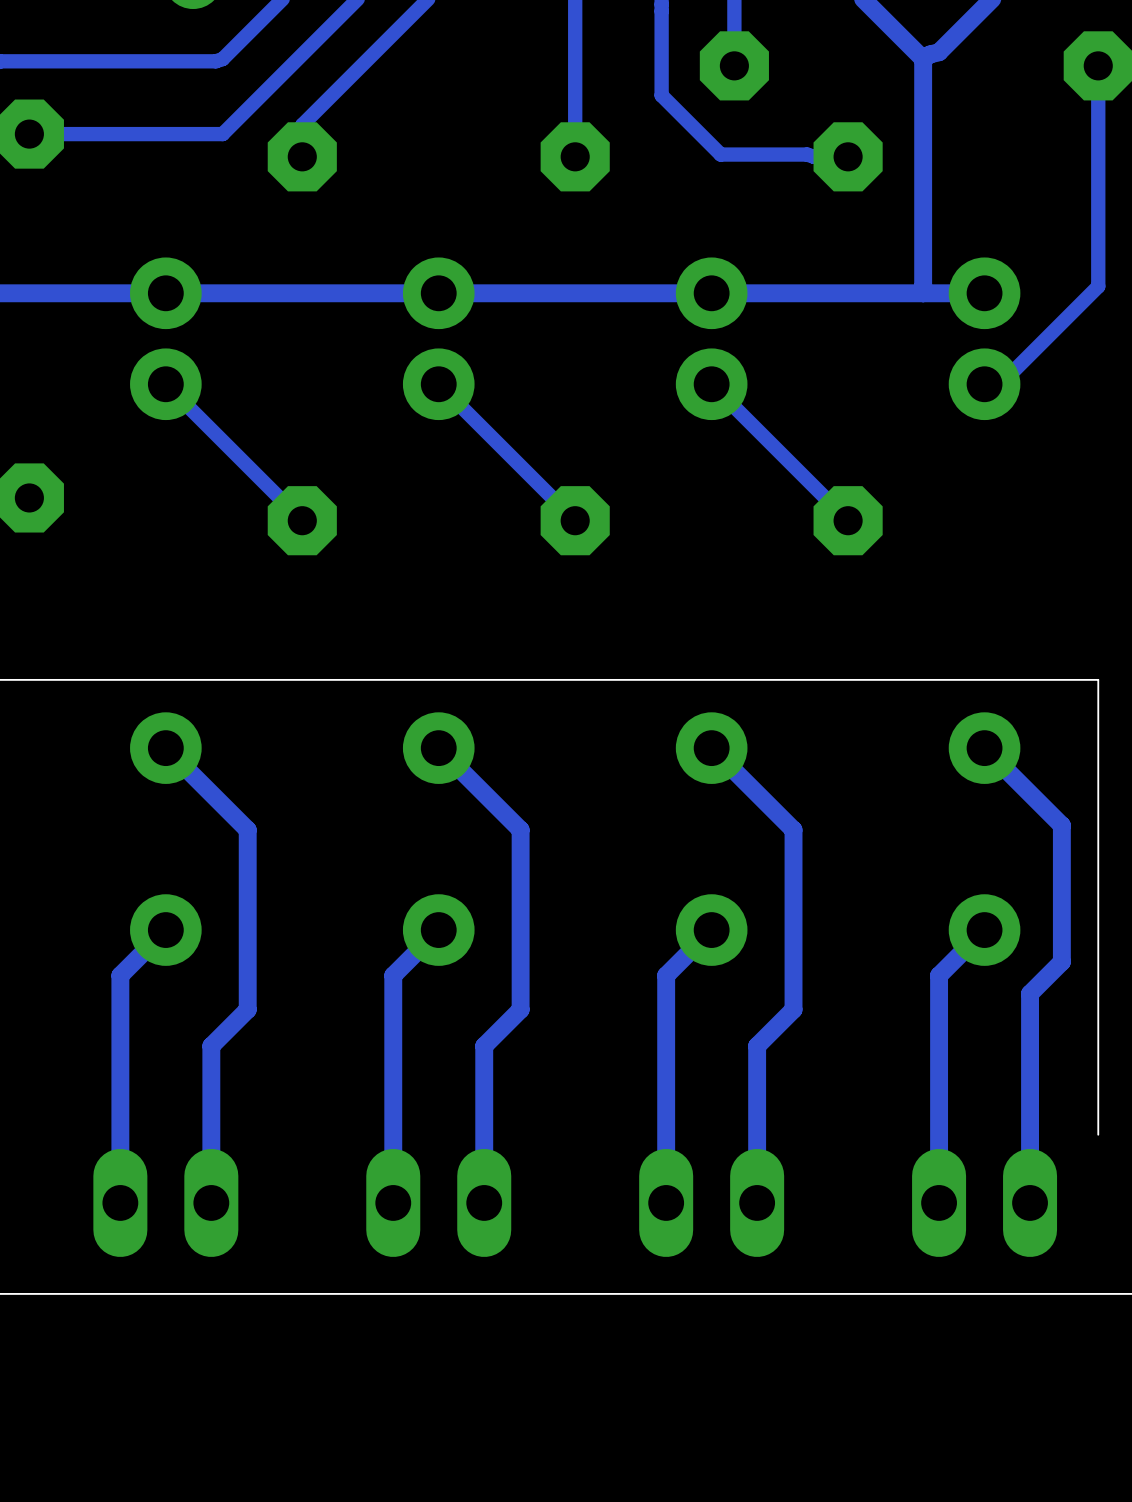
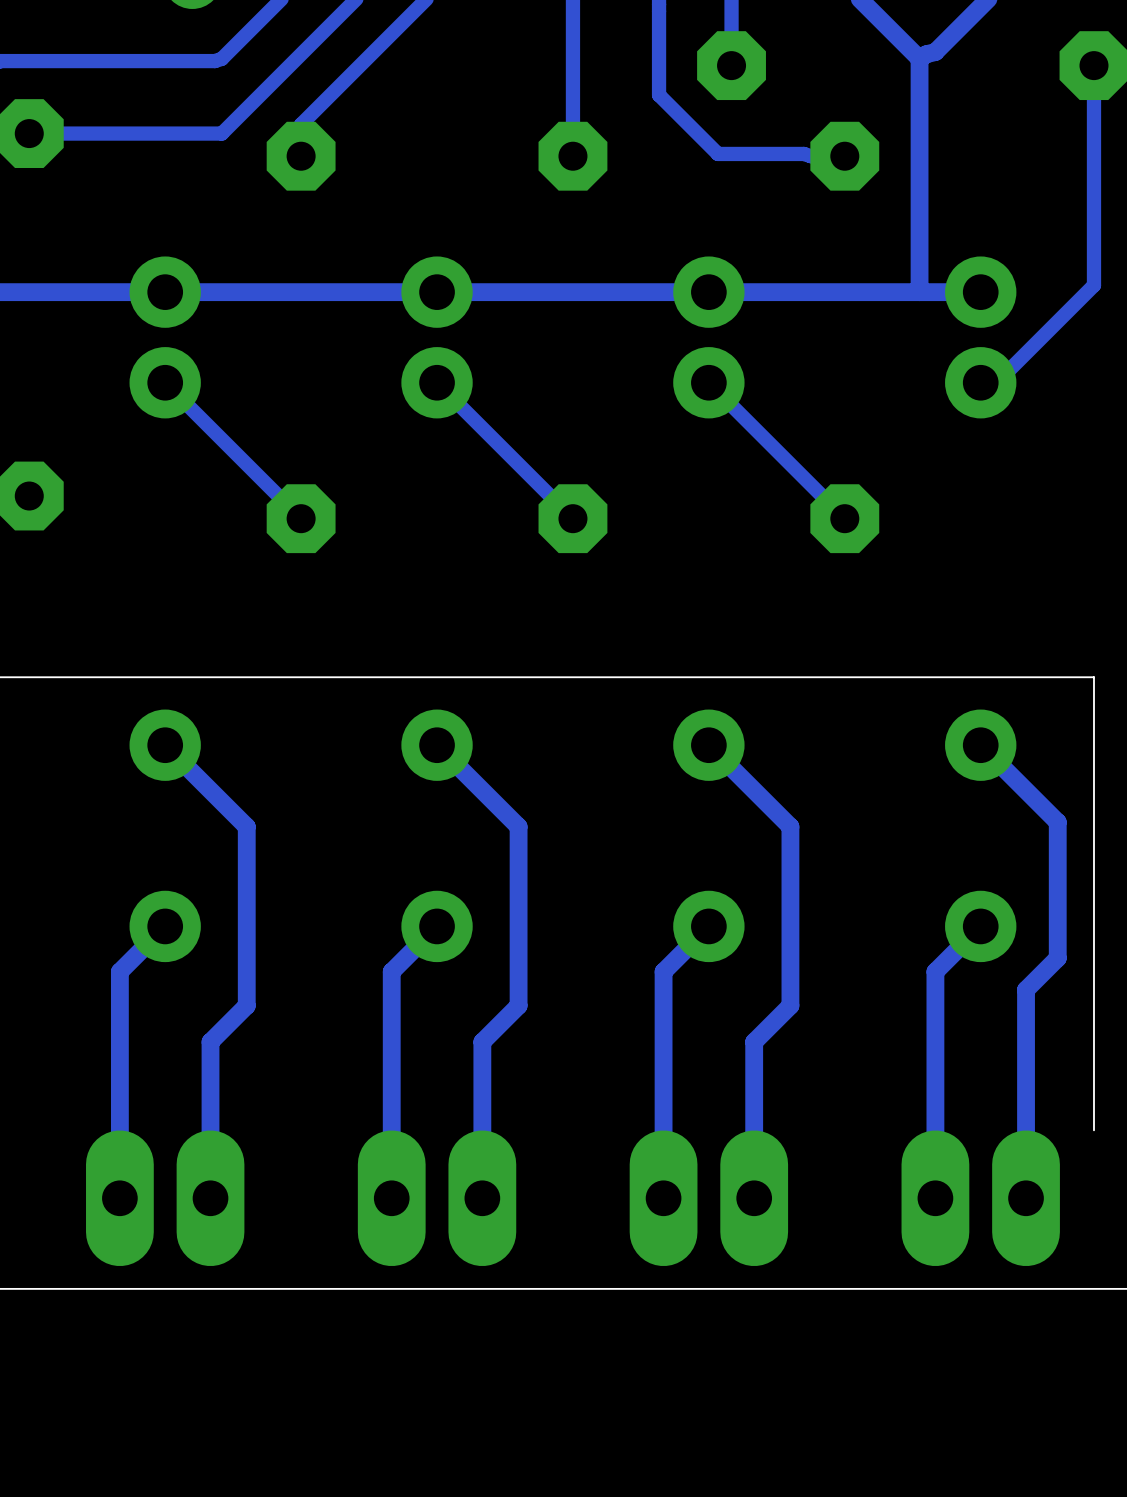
part footprint: [93, 1148, 239, 1257] -> [86, 1130, 245, 1267]
part footprint: [366, 1148, 512, 1257] -> [357, 1130, 517, 1267]
part footprint: [639, 1148, 785, 1257] -> [629, 1130, 789, 1267]
part footprint: [912, 1148, 1058, 1257] -> [901, 1130, 1060, 1267]

